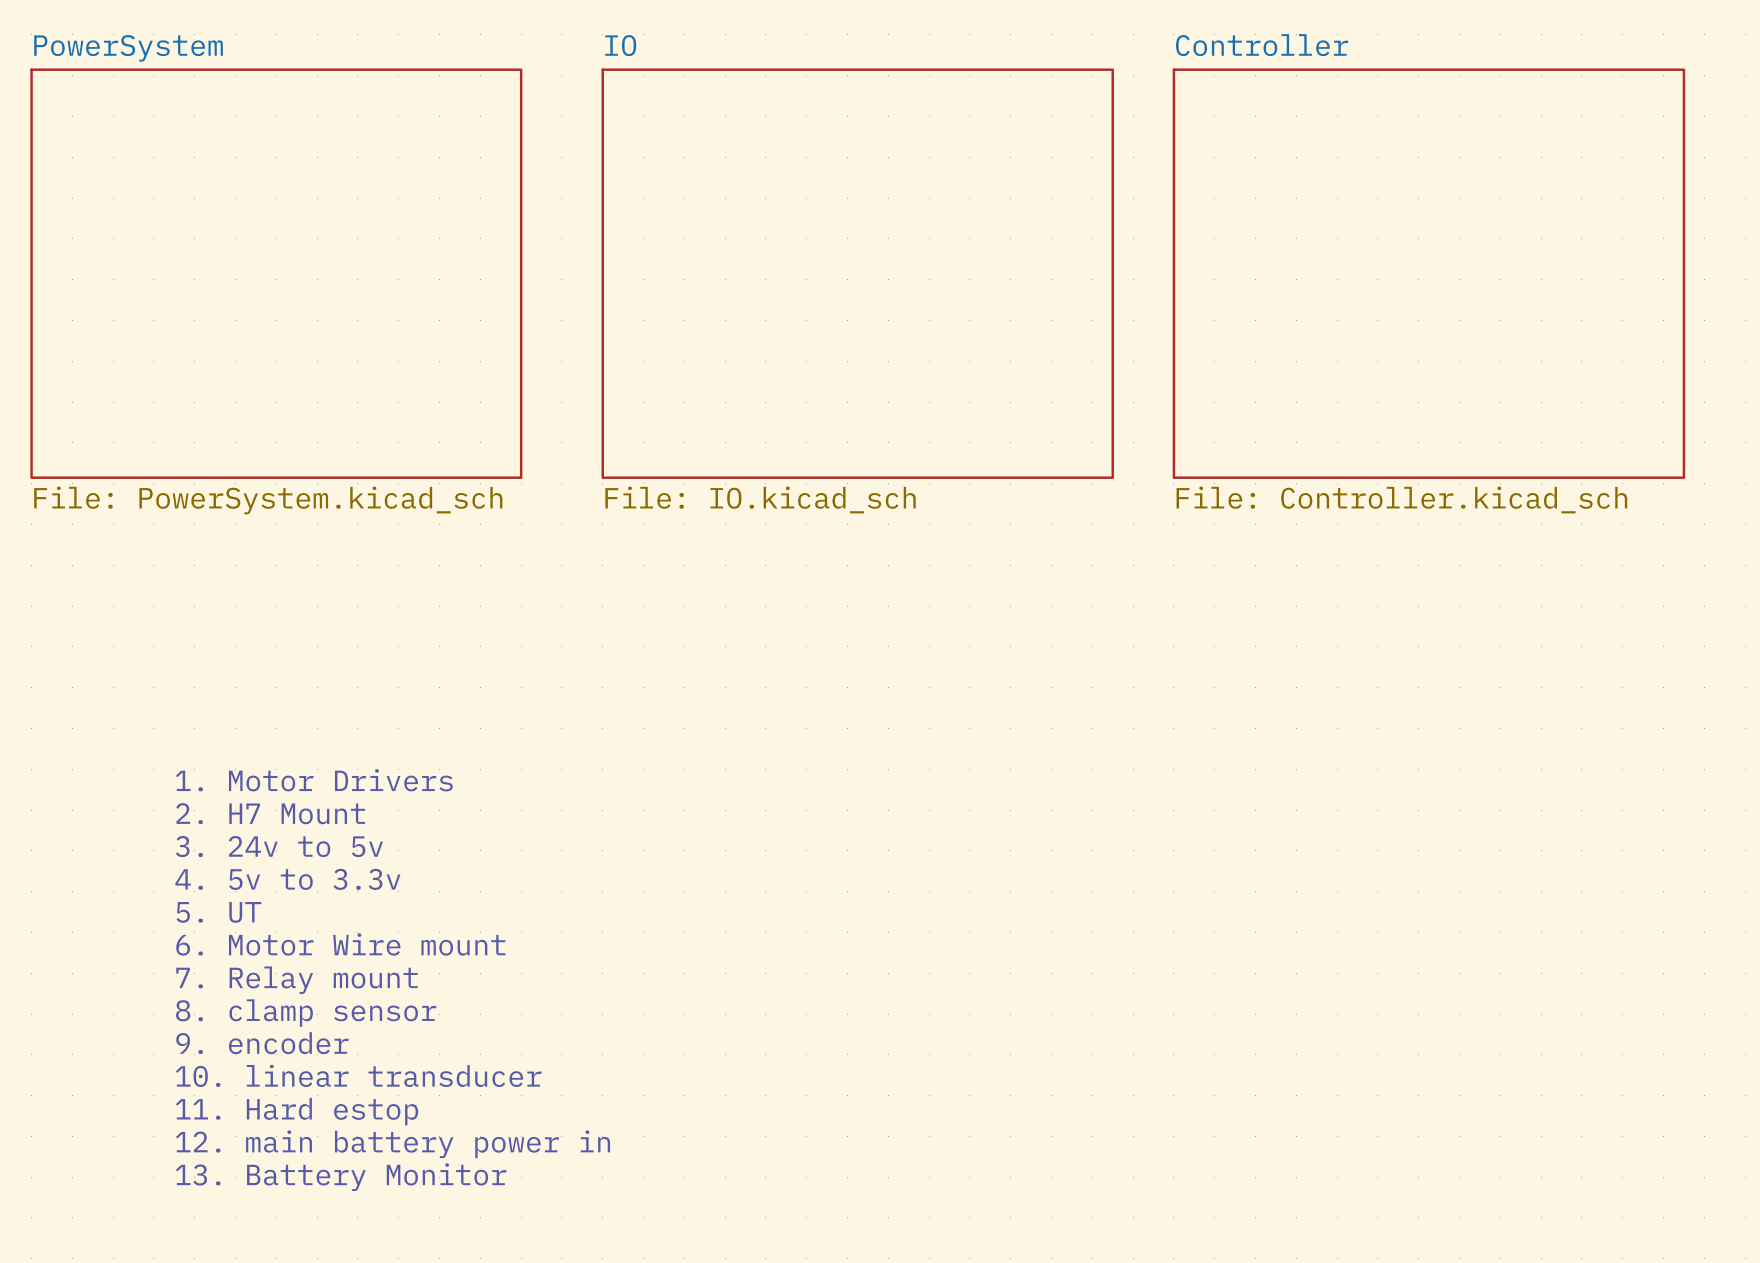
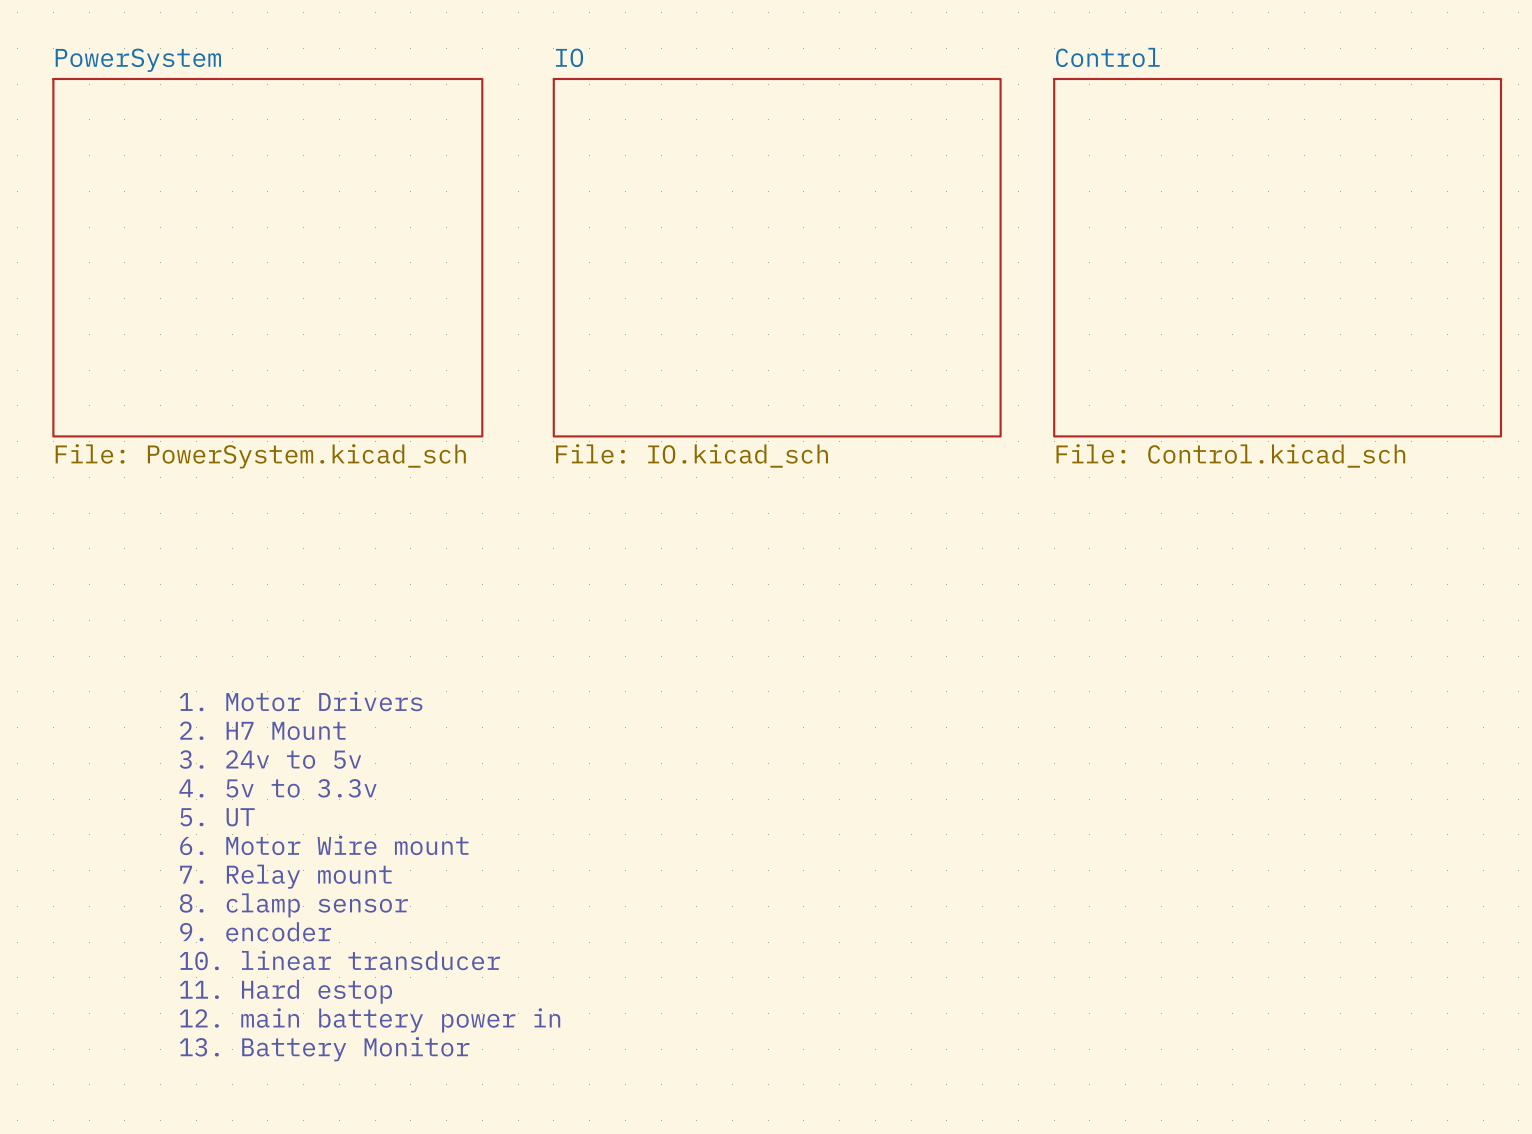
sheet Controller name: Controller (1262, 45) -> Control (1107, 57)
sheet Controller value: File: Controller.kicad_sch (1401, 500) -> File: Control.kicad_sch (1230, 455)

